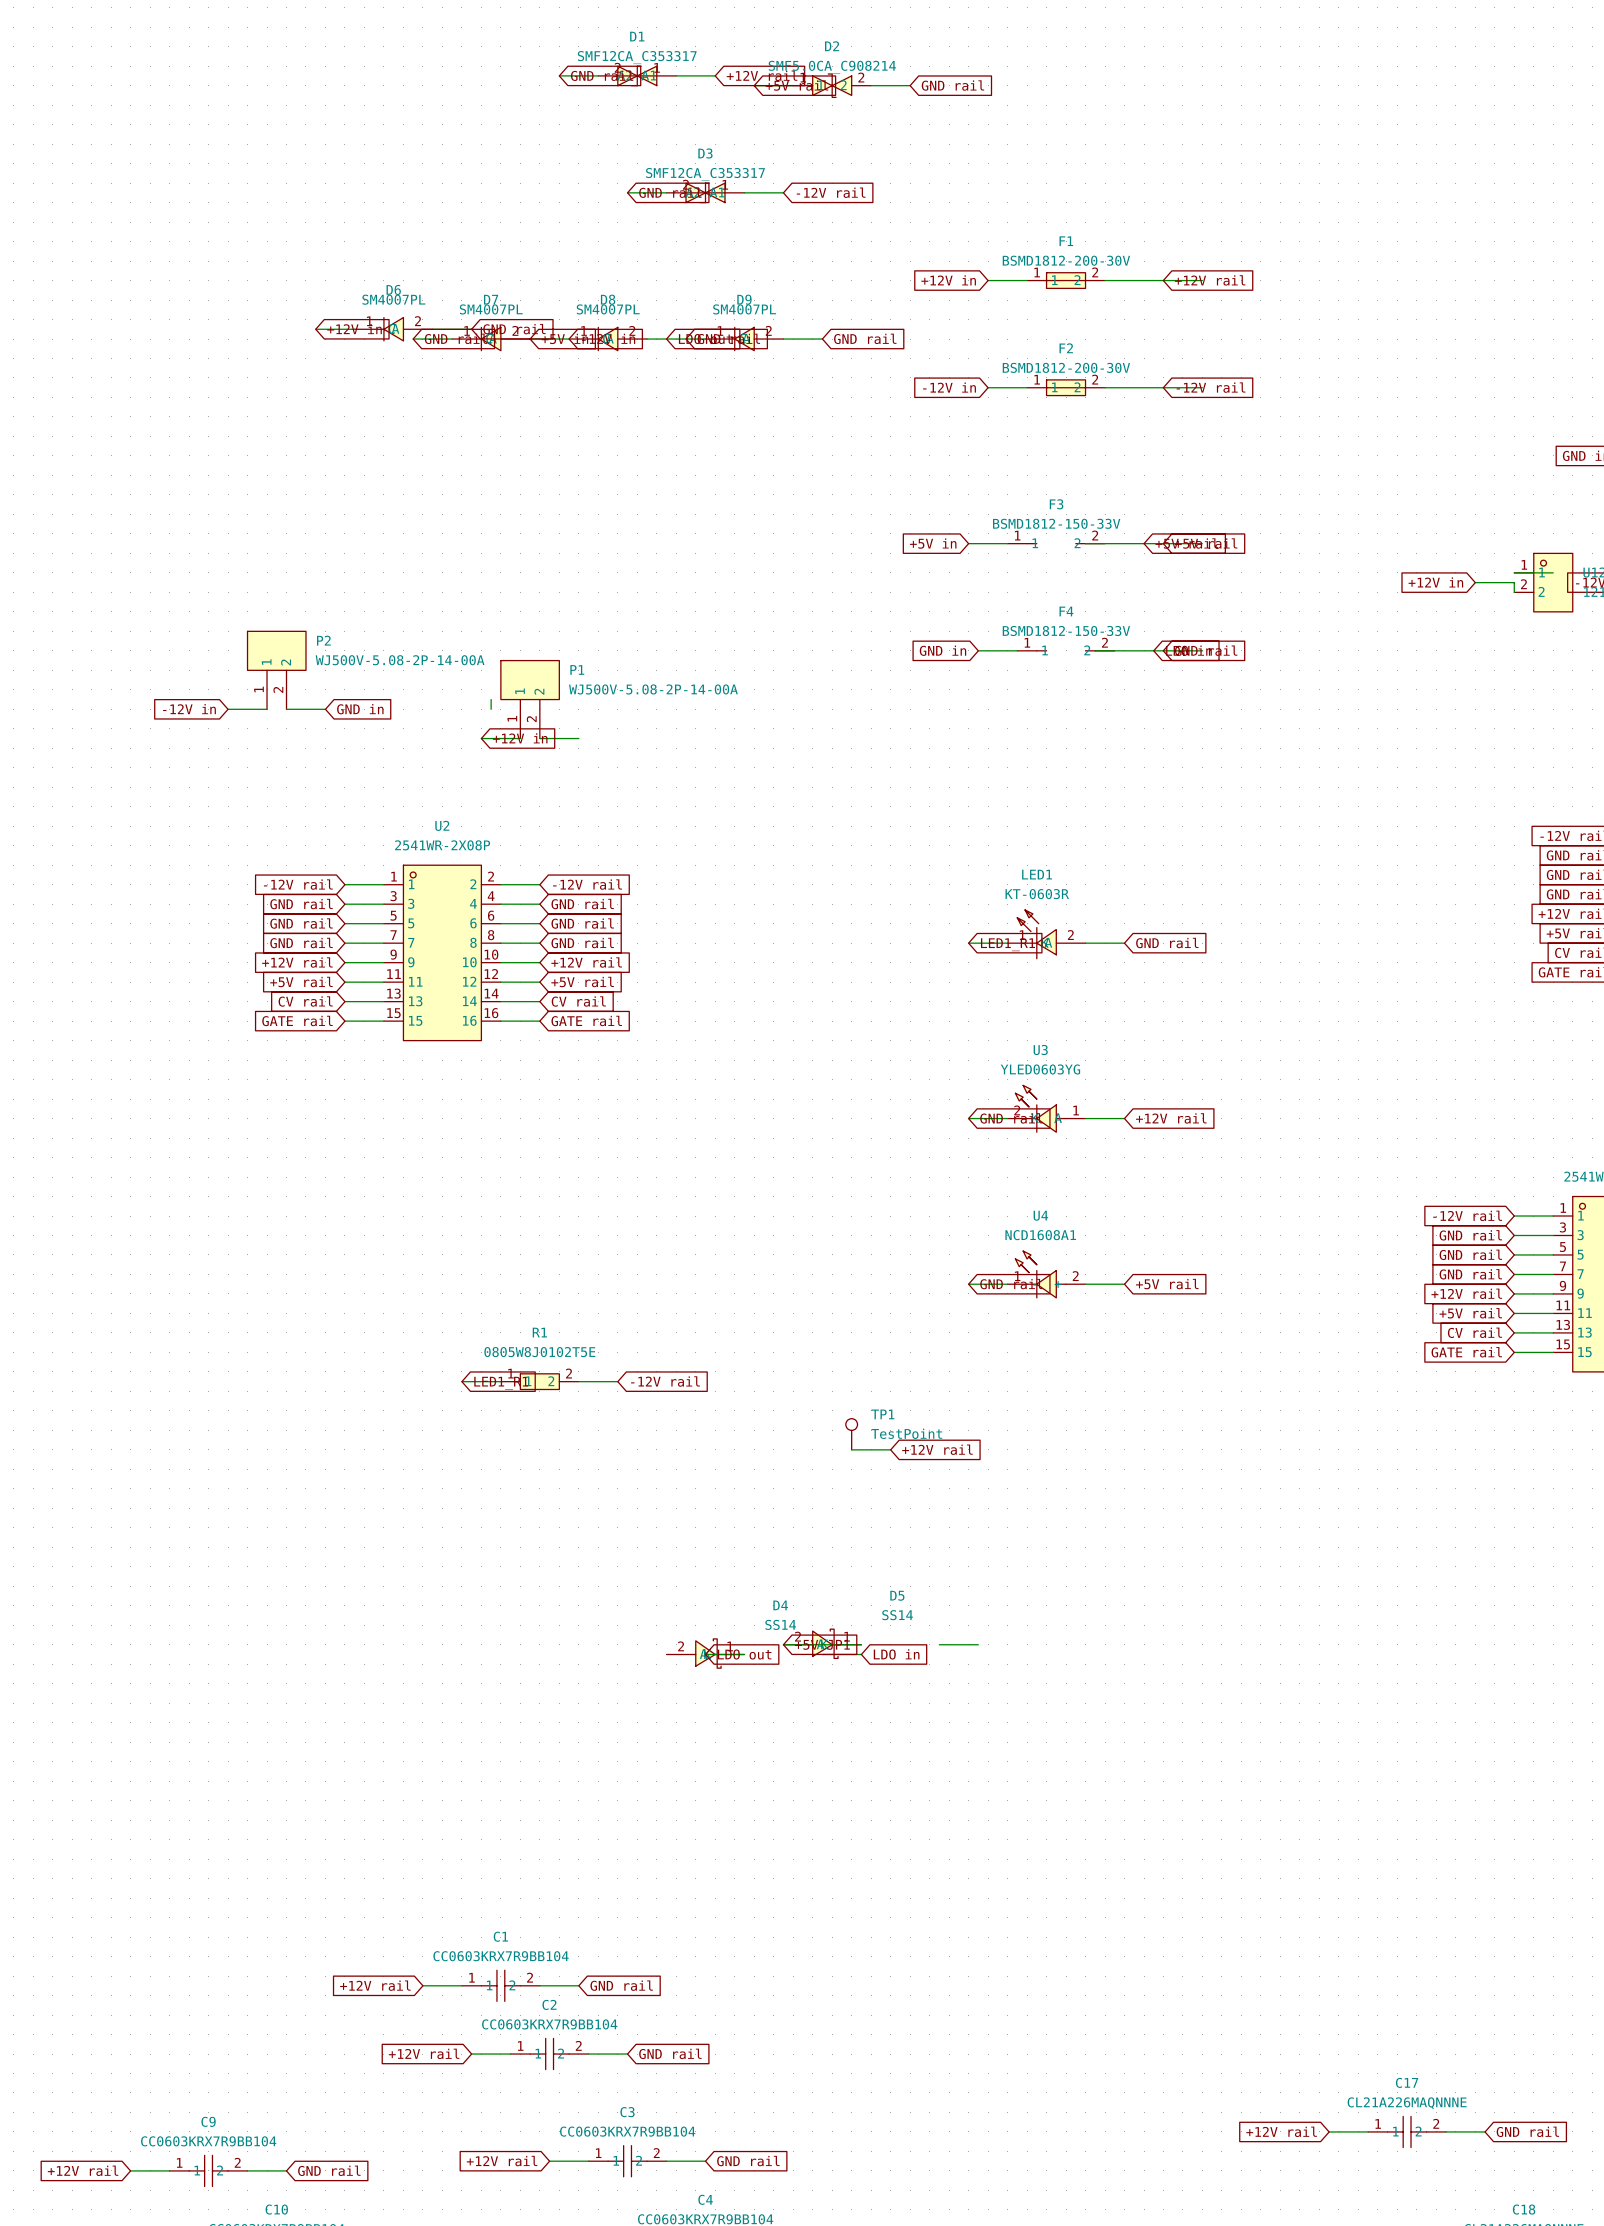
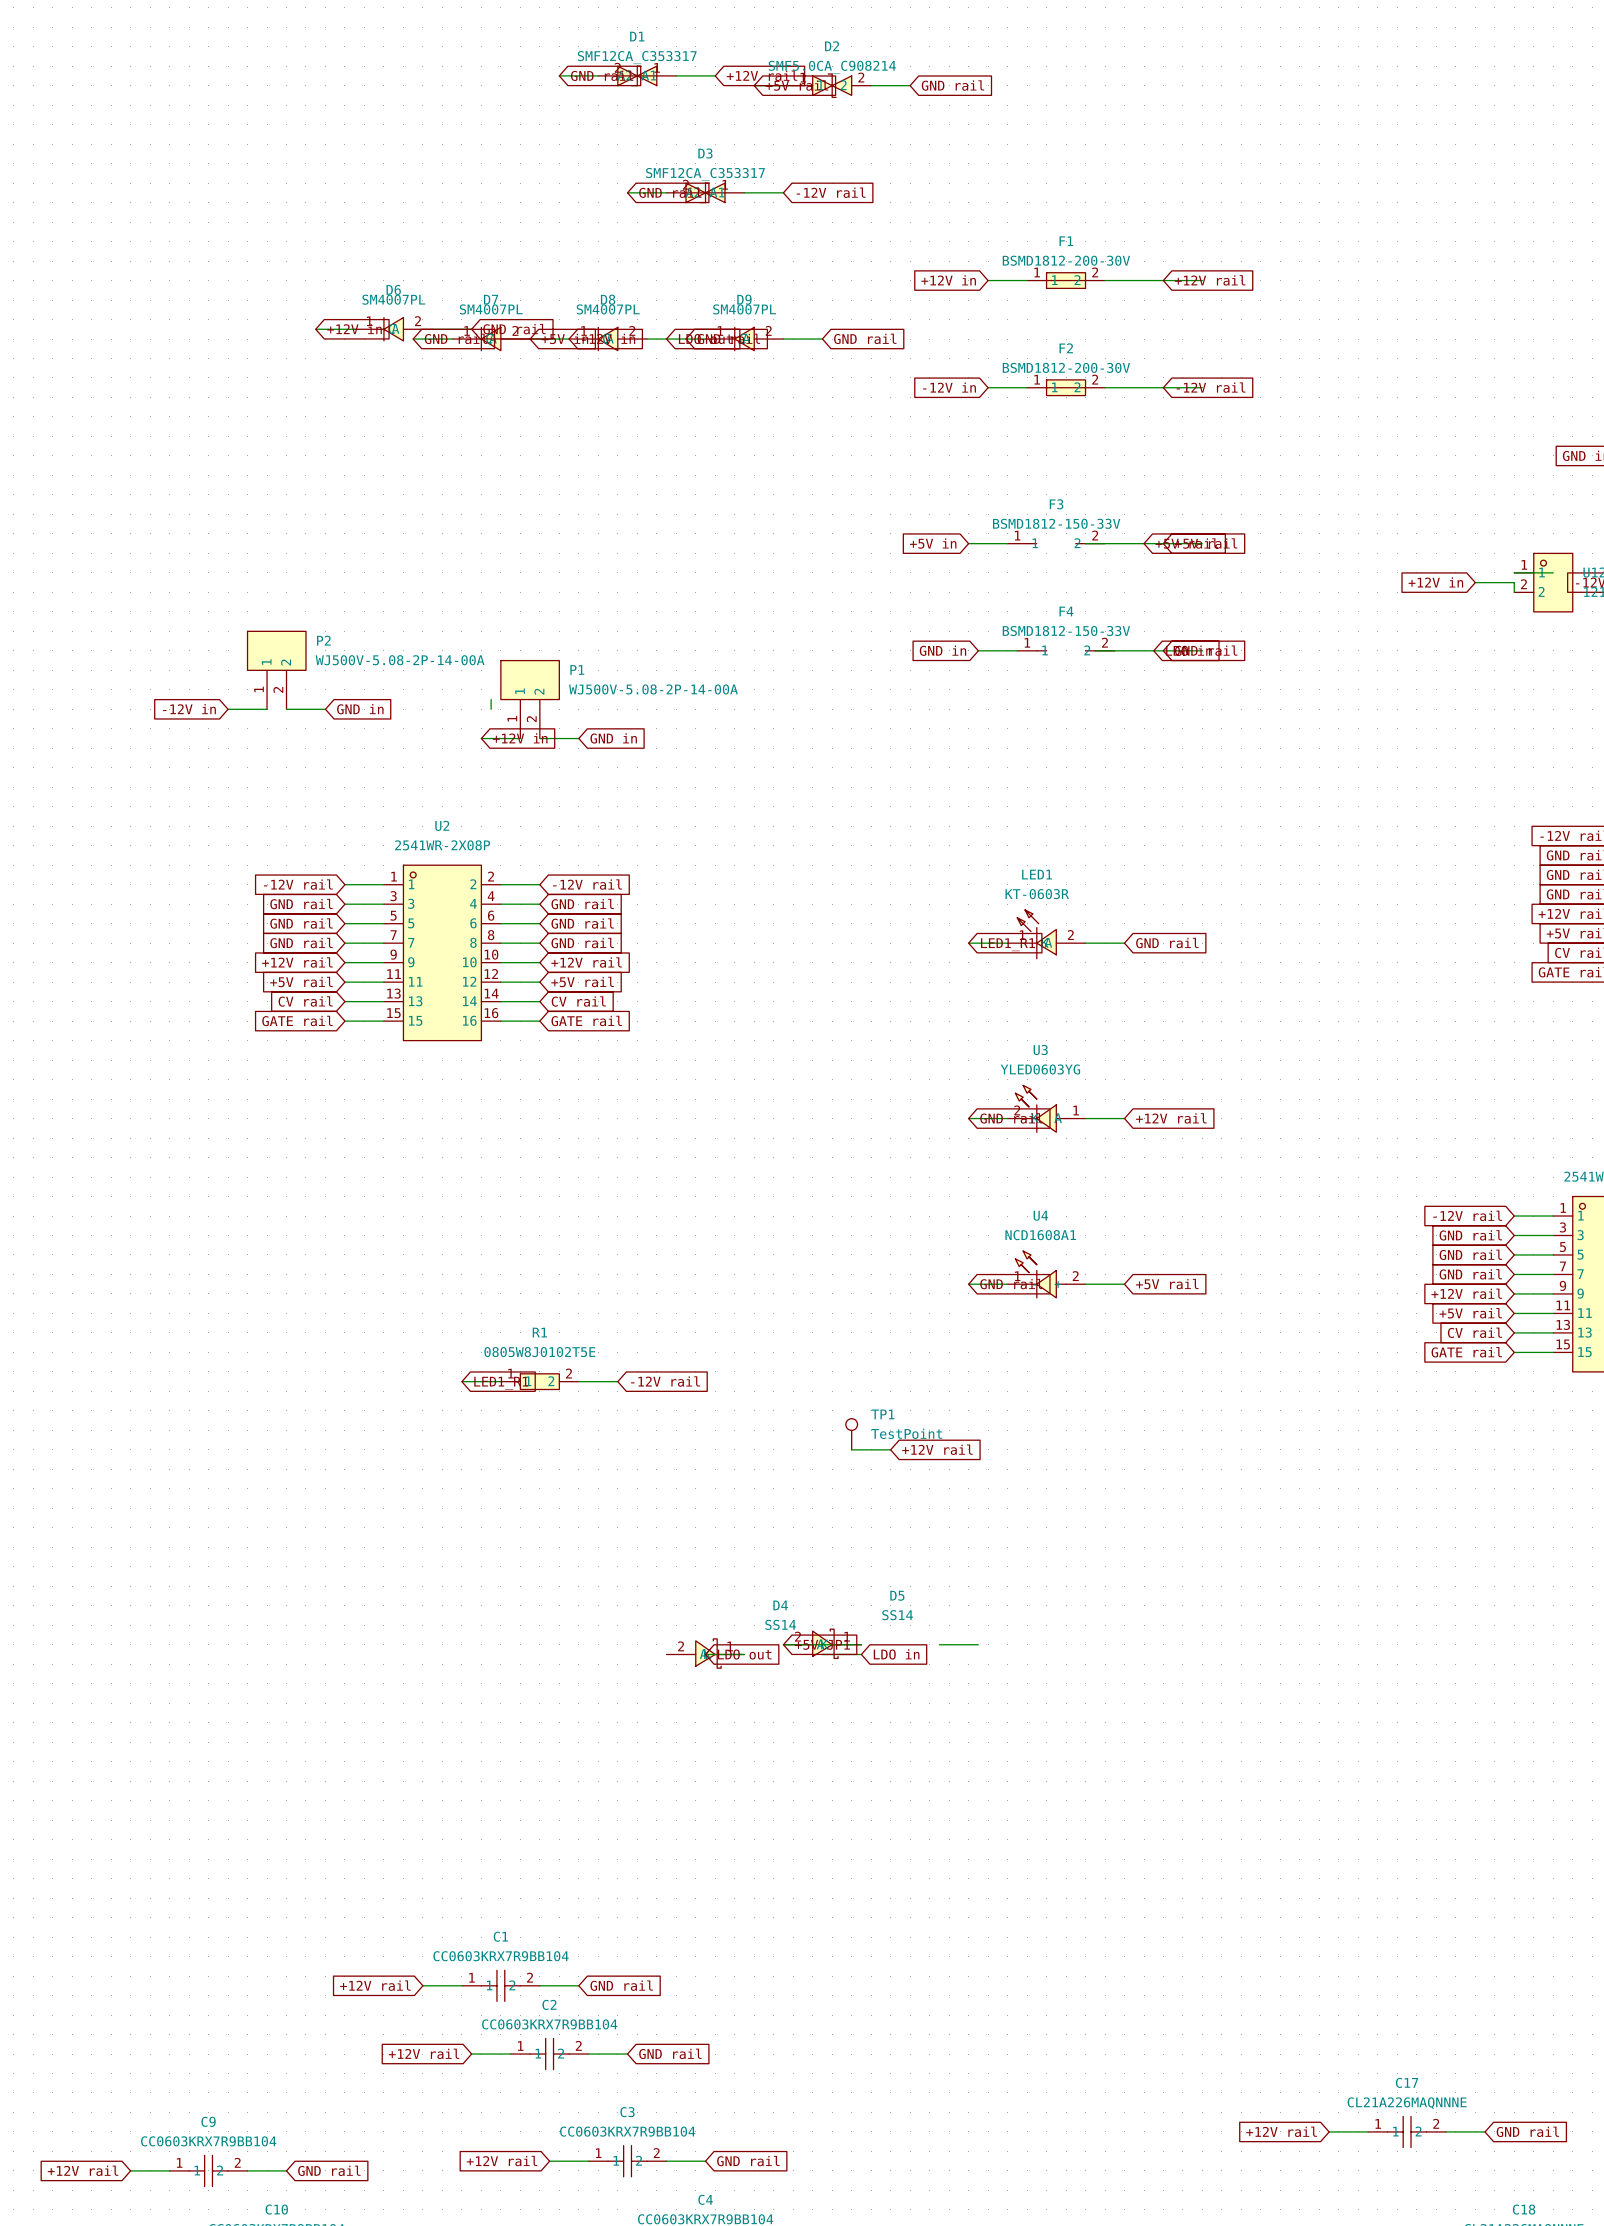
global label: none -> GND in (613, 738)

